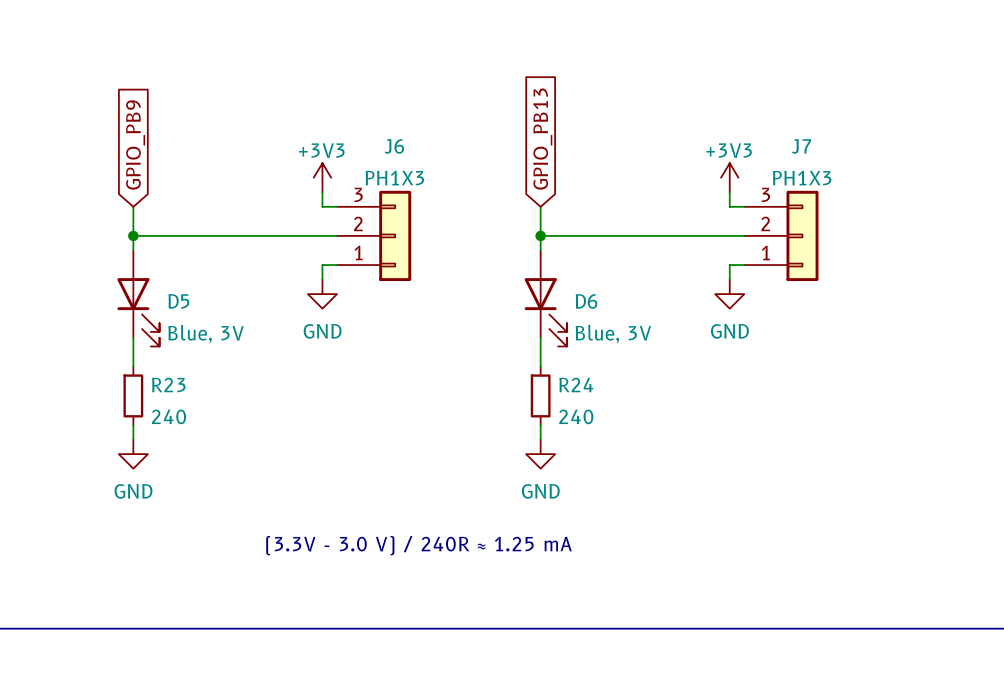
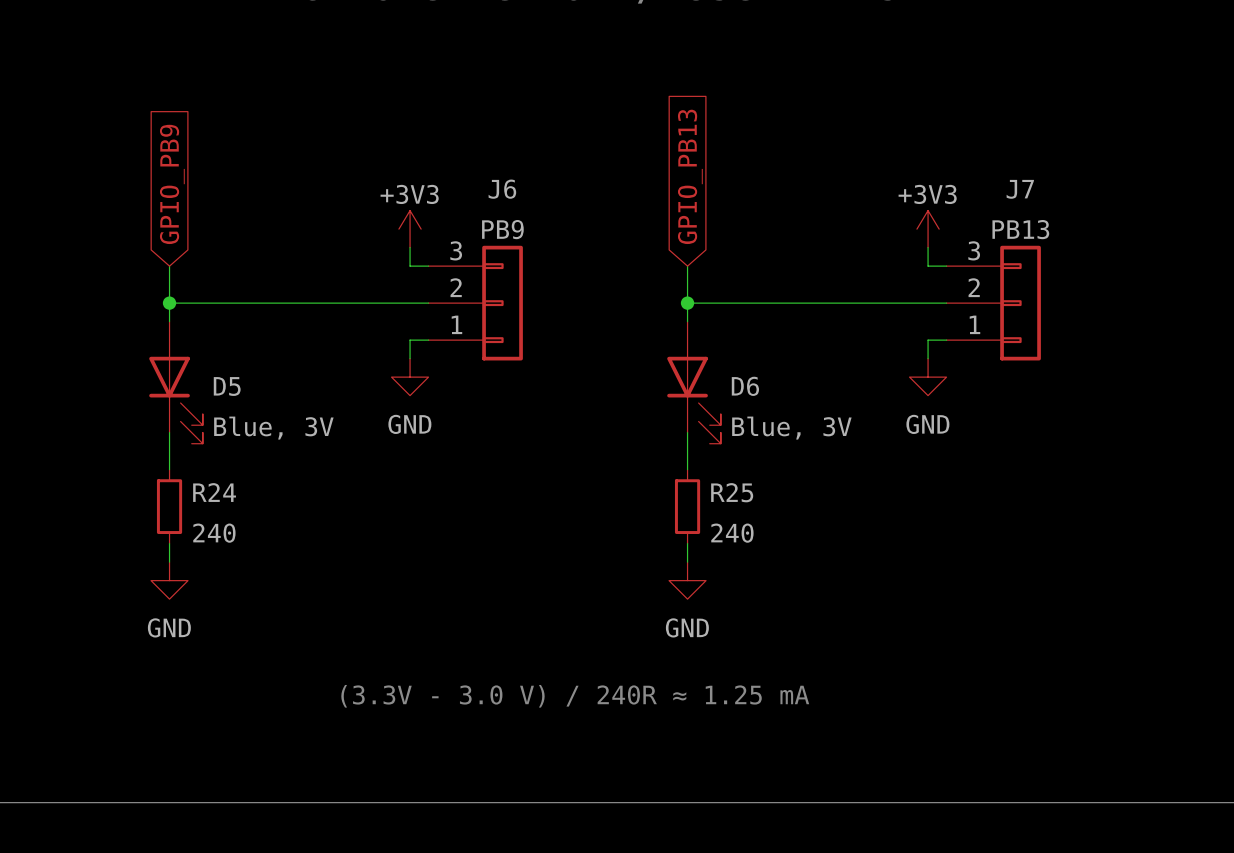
J6 value: PH1X3 (394, 178) -> PB9 (502, 229)
J7 value: PH1X3 (802, 178) -> PB13 (1020, 229)
R24 name: R24 (576, 384) -> R25 (732, 492)
R23 name: R23 (168, 385) -> R24 (214, 492)

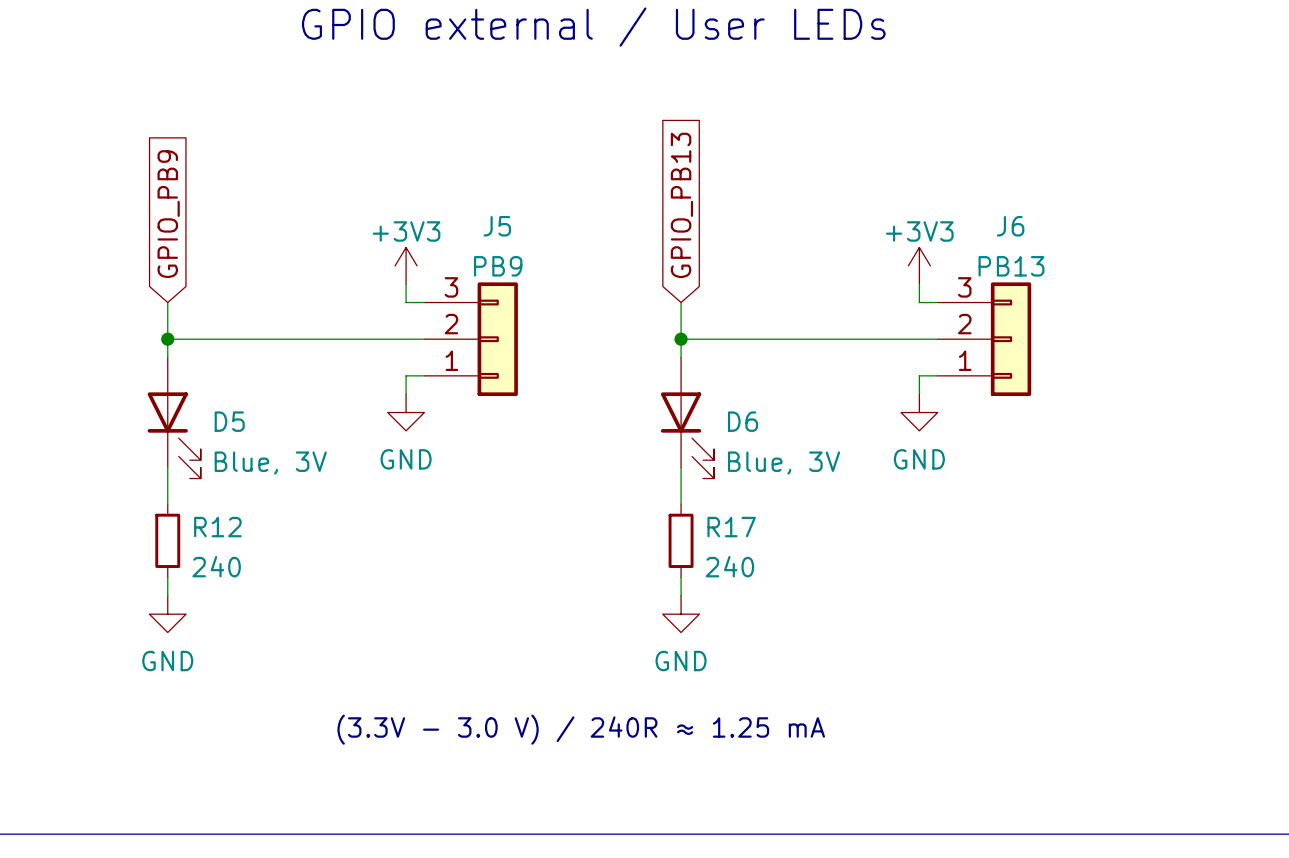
J6 name: J6 (502, 189) -> J5 (497, 226)
J7 name: J7 (1020, 189) -> J6 (1010, 226)
R24 name: R24 (214, 492) -> R12 (217, 527)
R25 name: R25 (732, 492) -> R17 (731, 527)

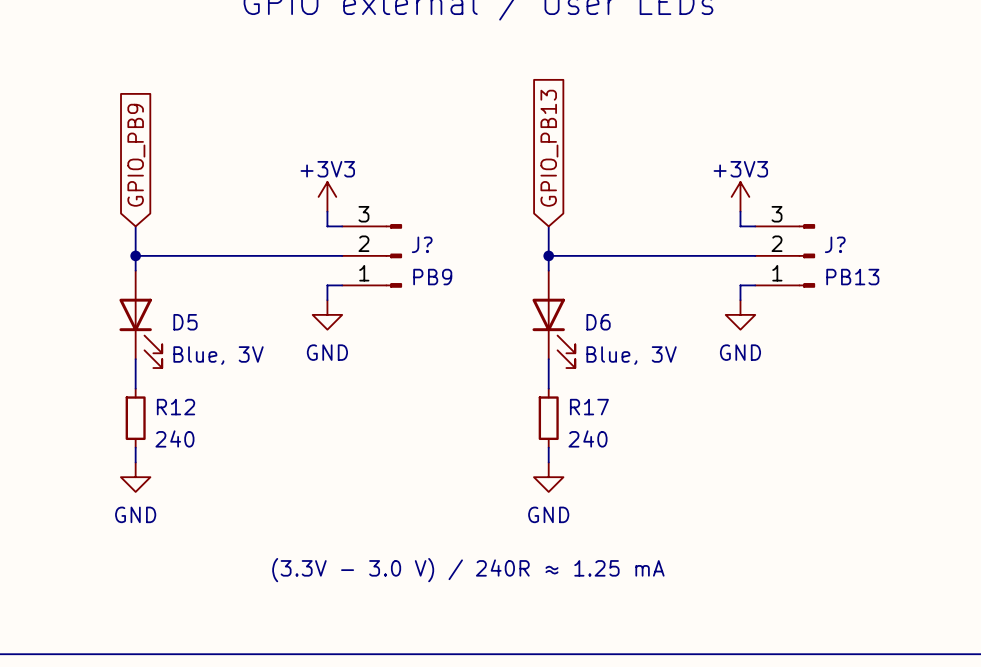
J?: none -> PB9 (372, 255)
J5: PB9 (471, 339) -> none
J?: none -> PB13 (785, 255)
J6: PB13 (984, 339) -> none

